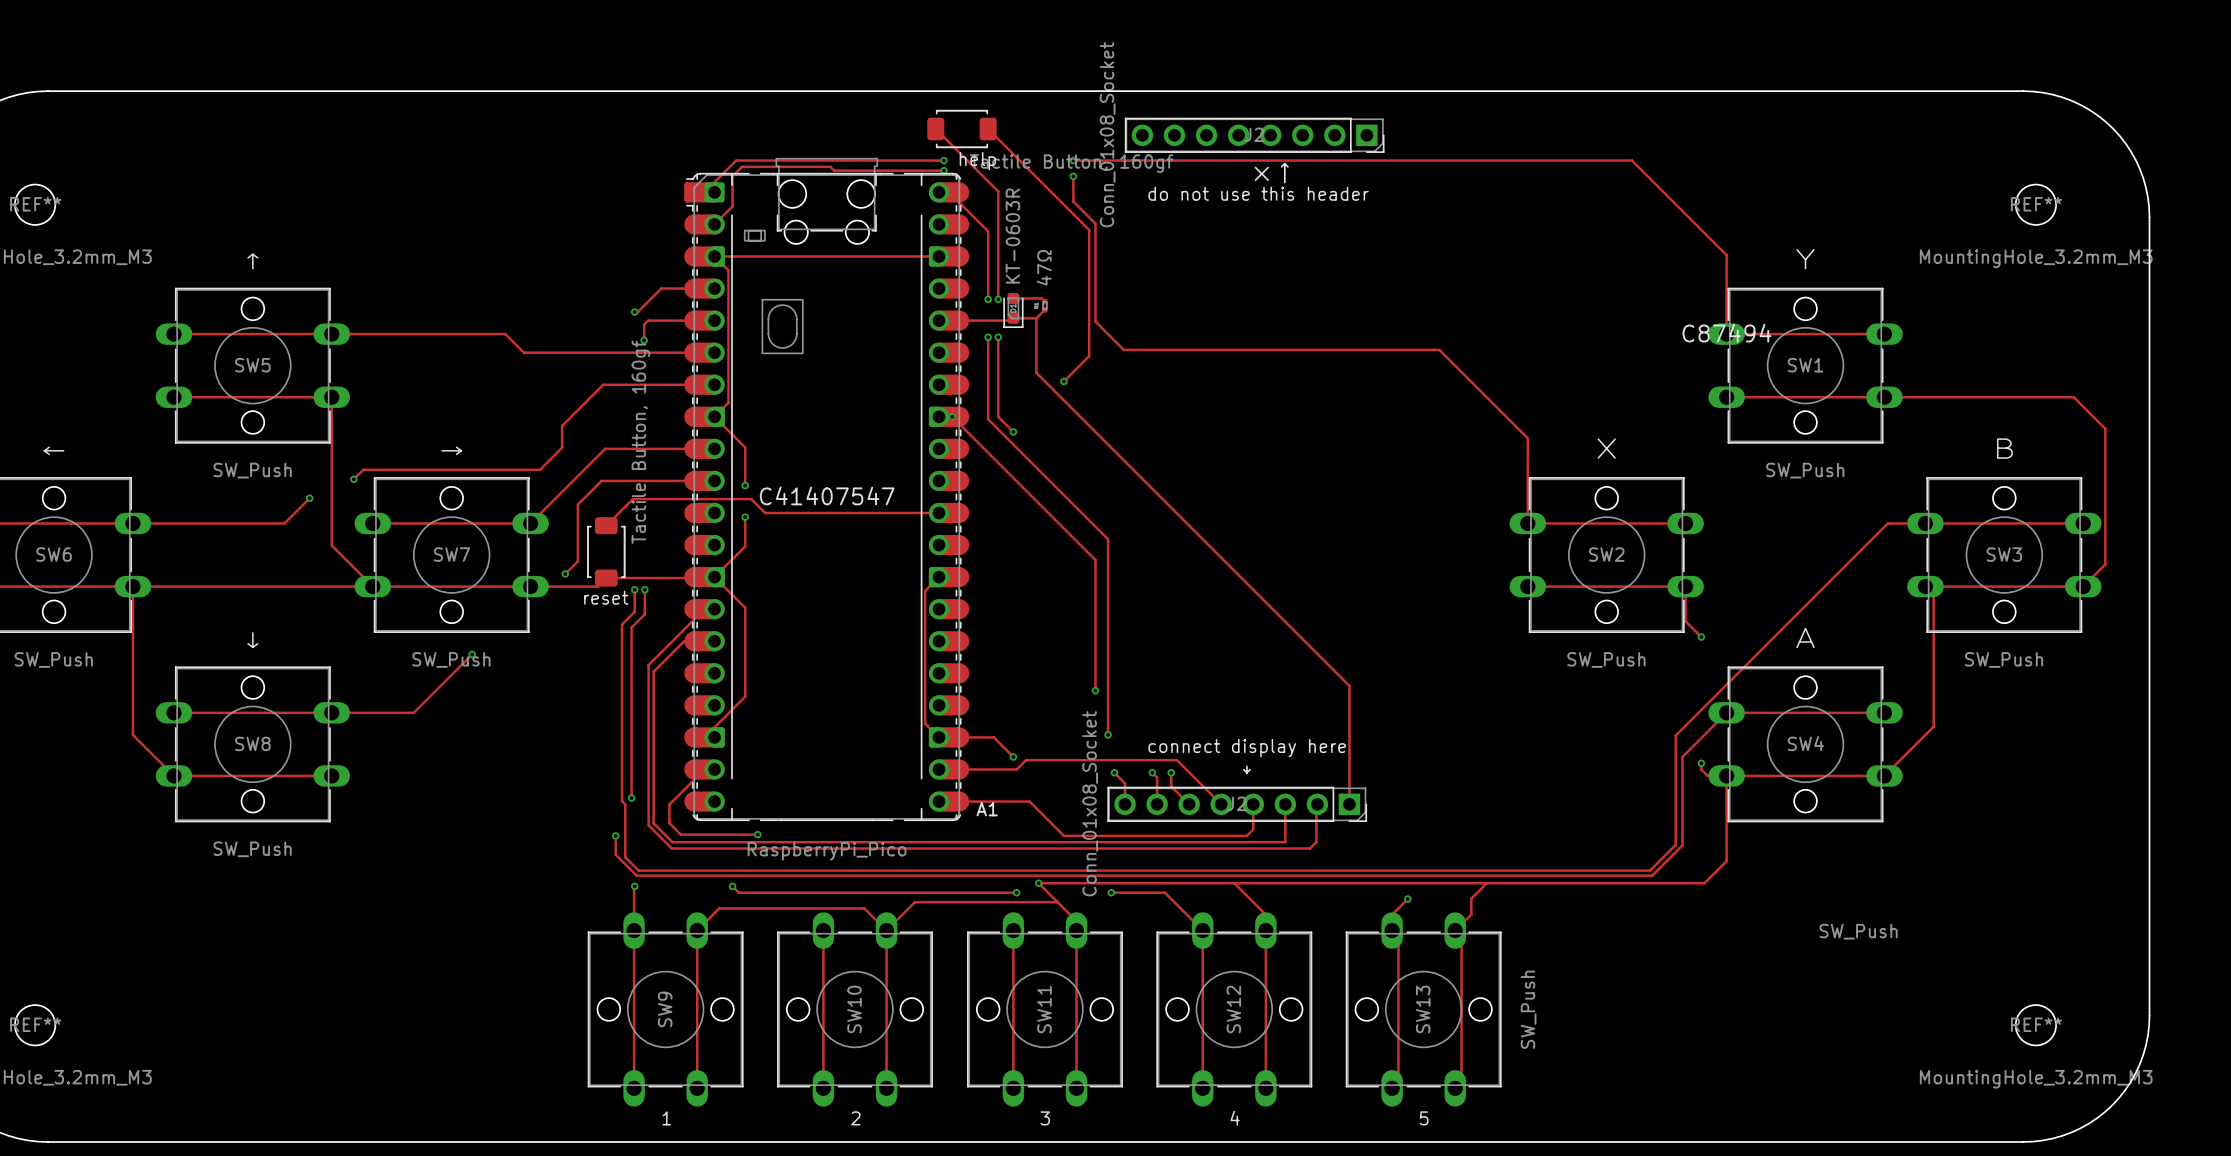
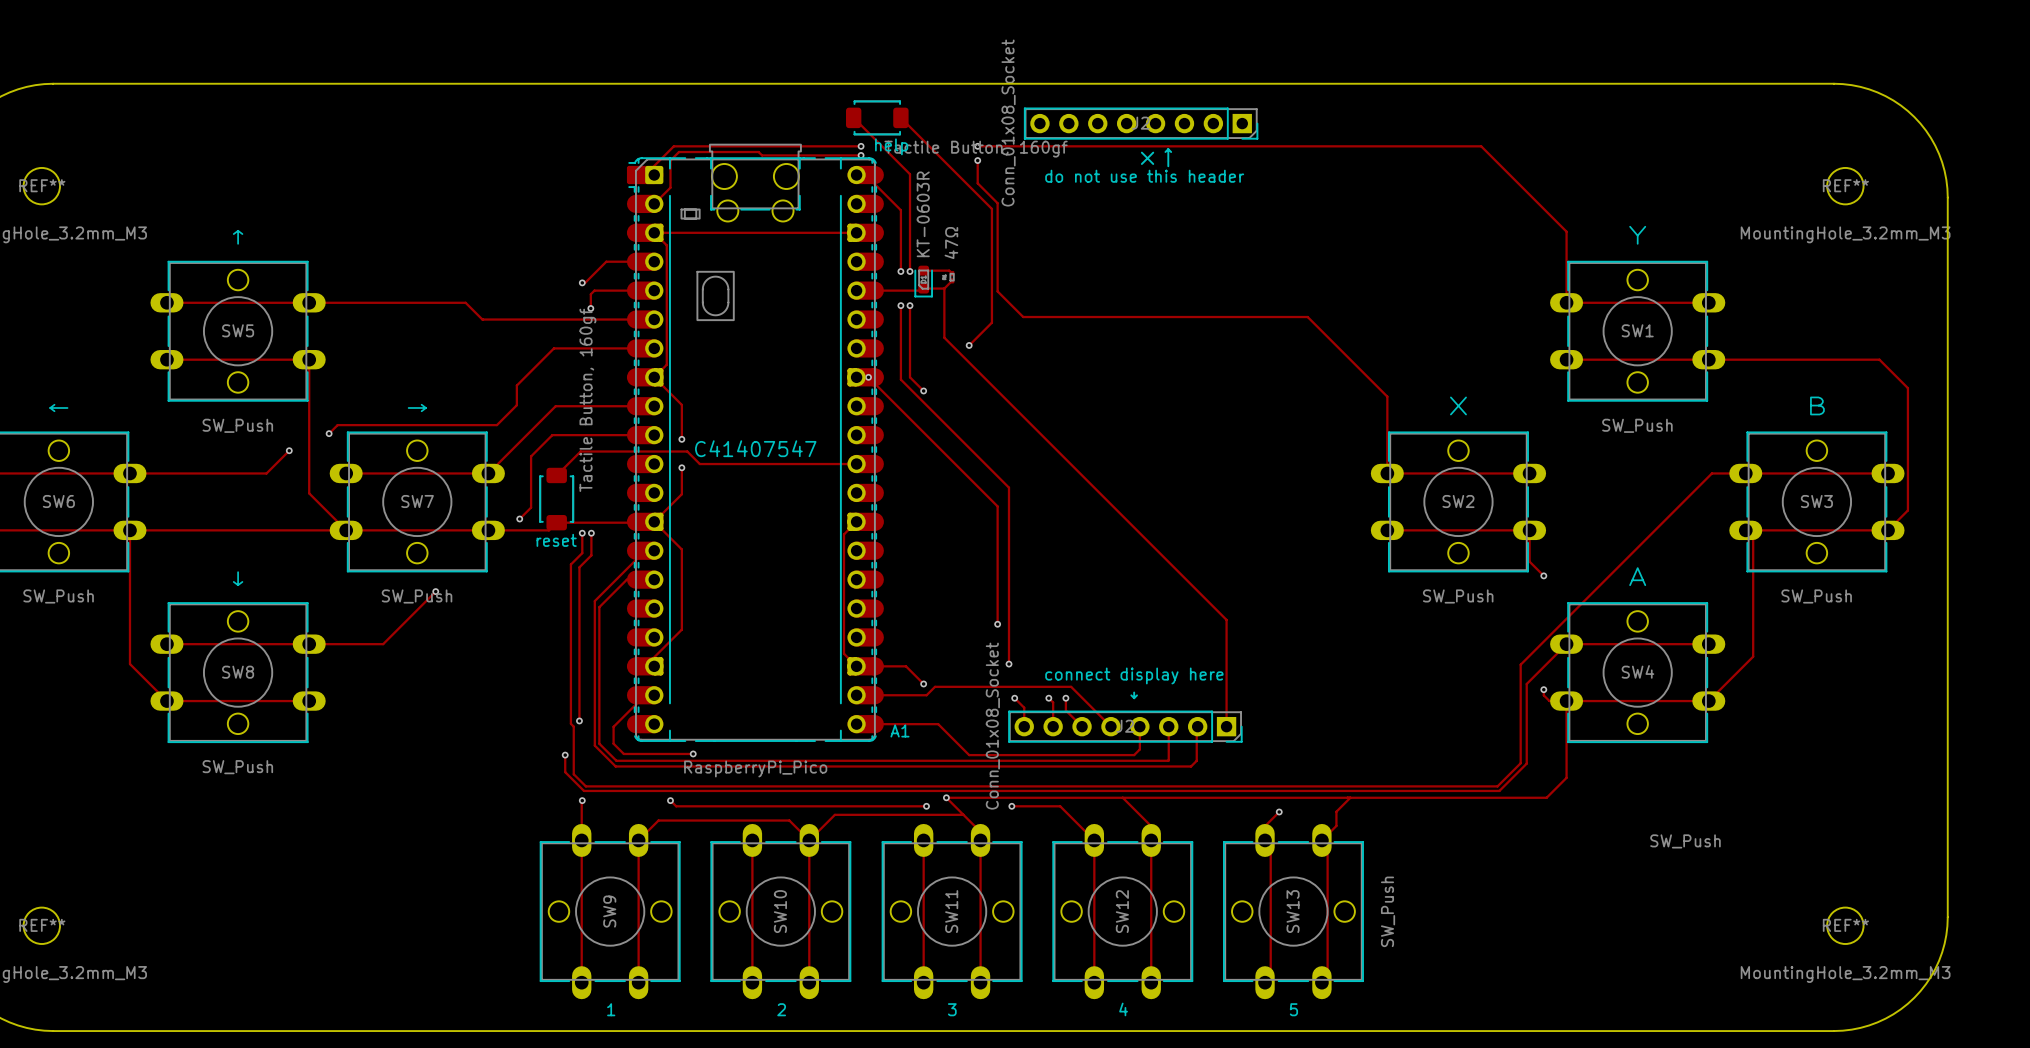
SW1 text: C87494 (1727, 333) -> none

